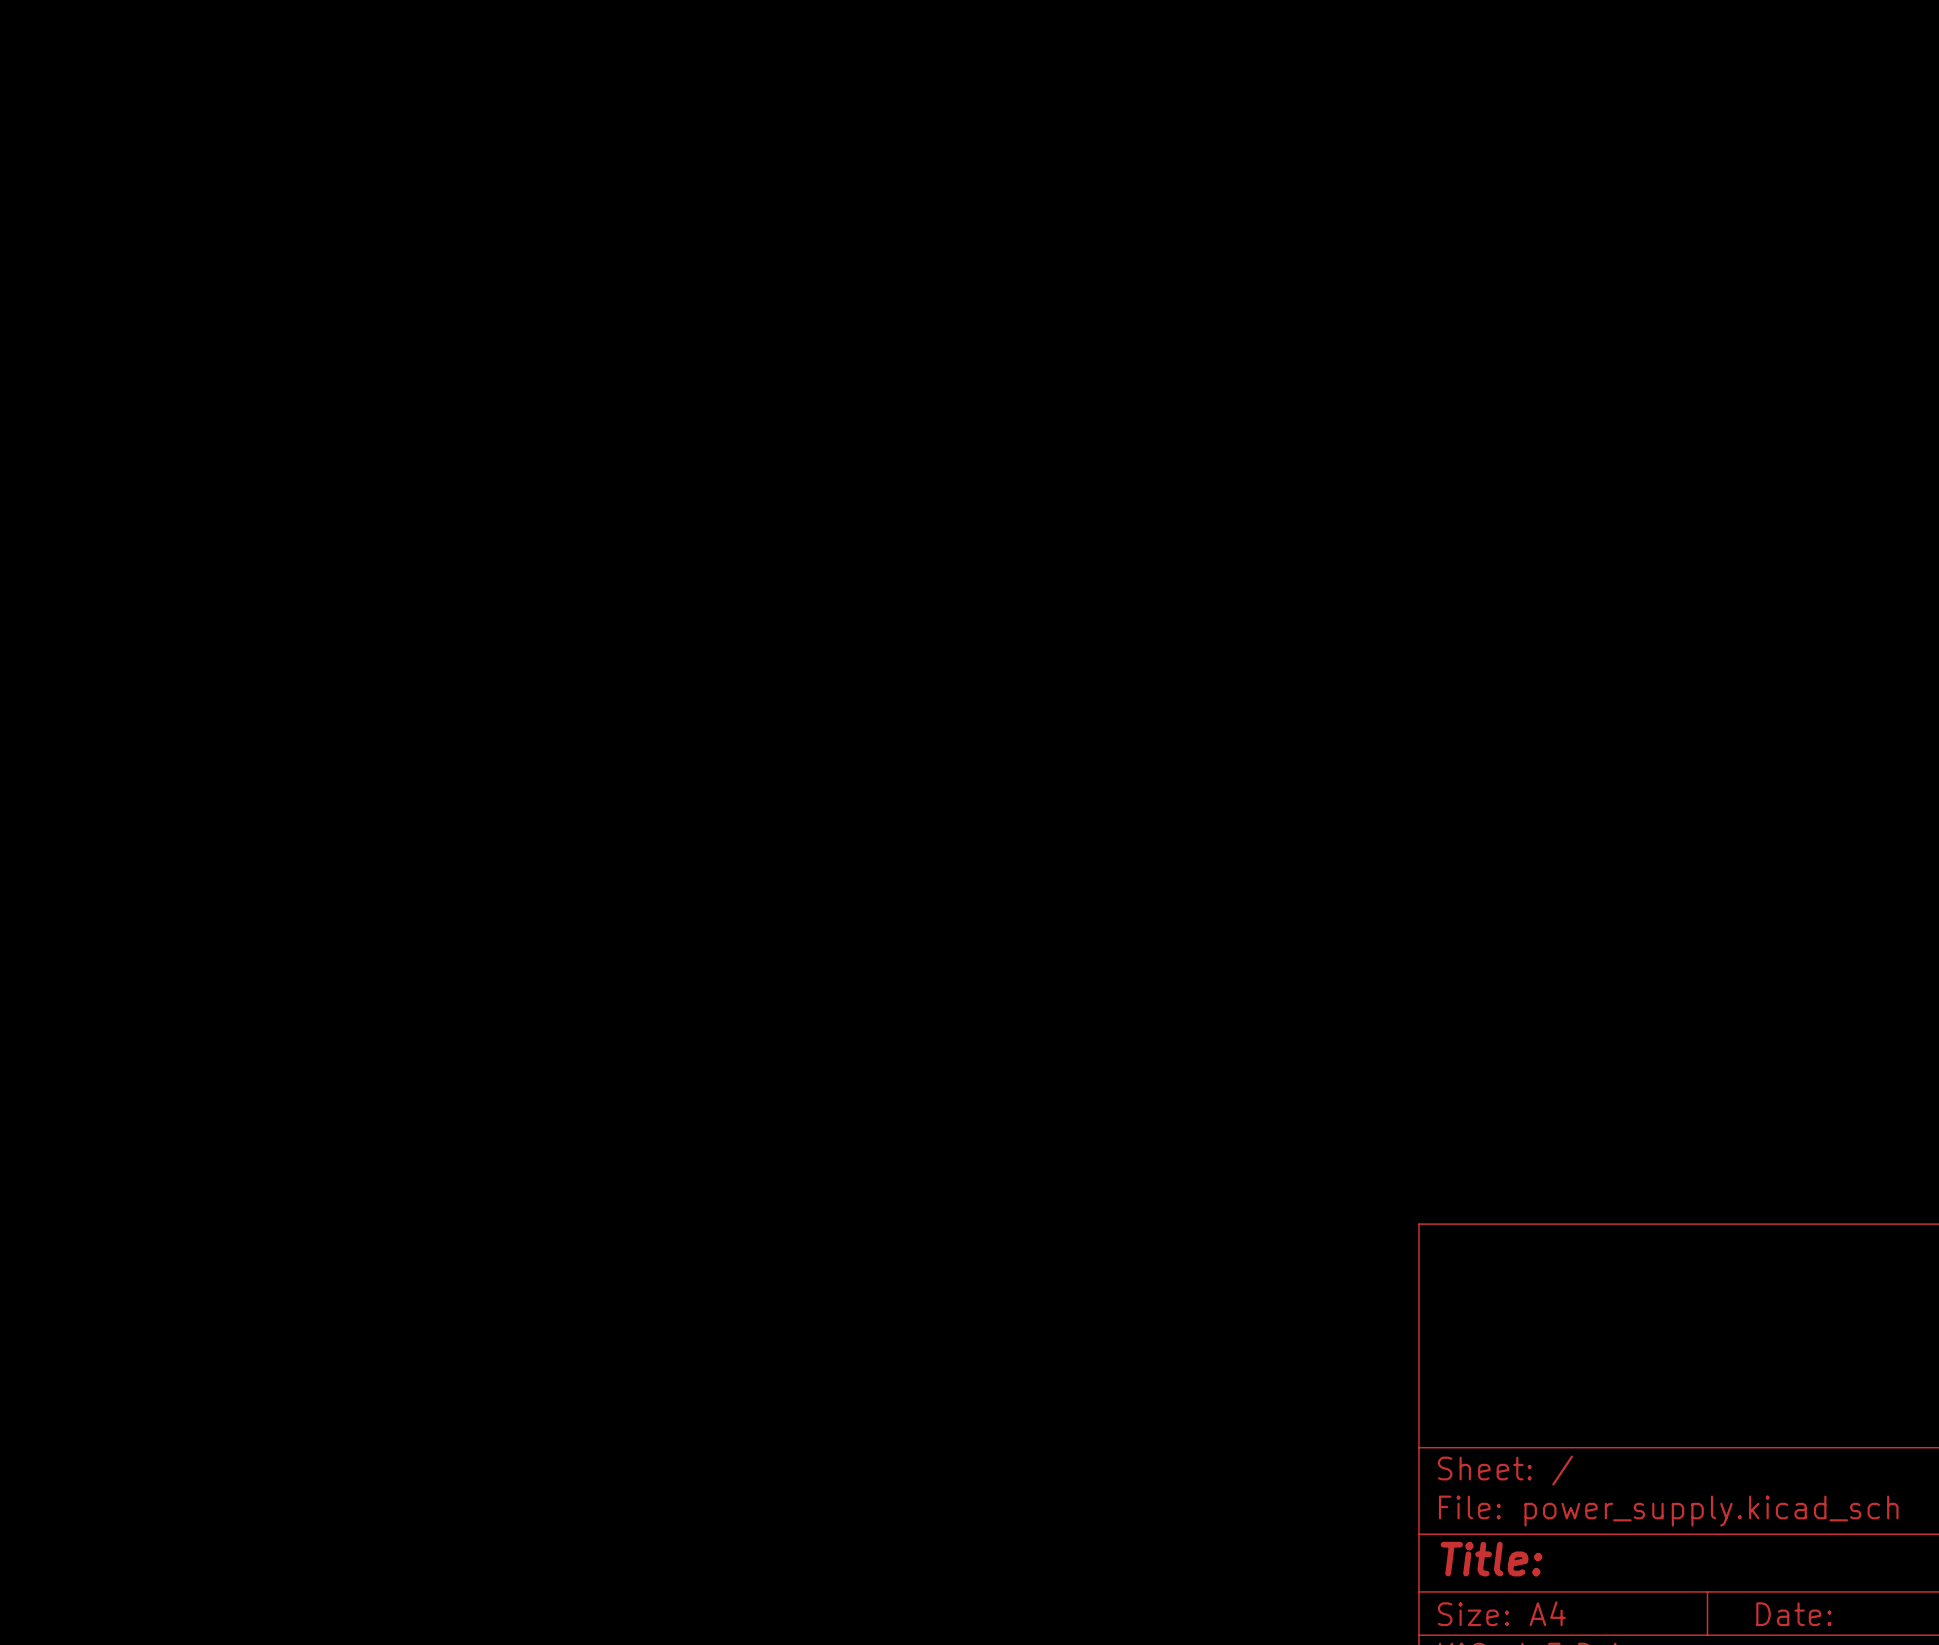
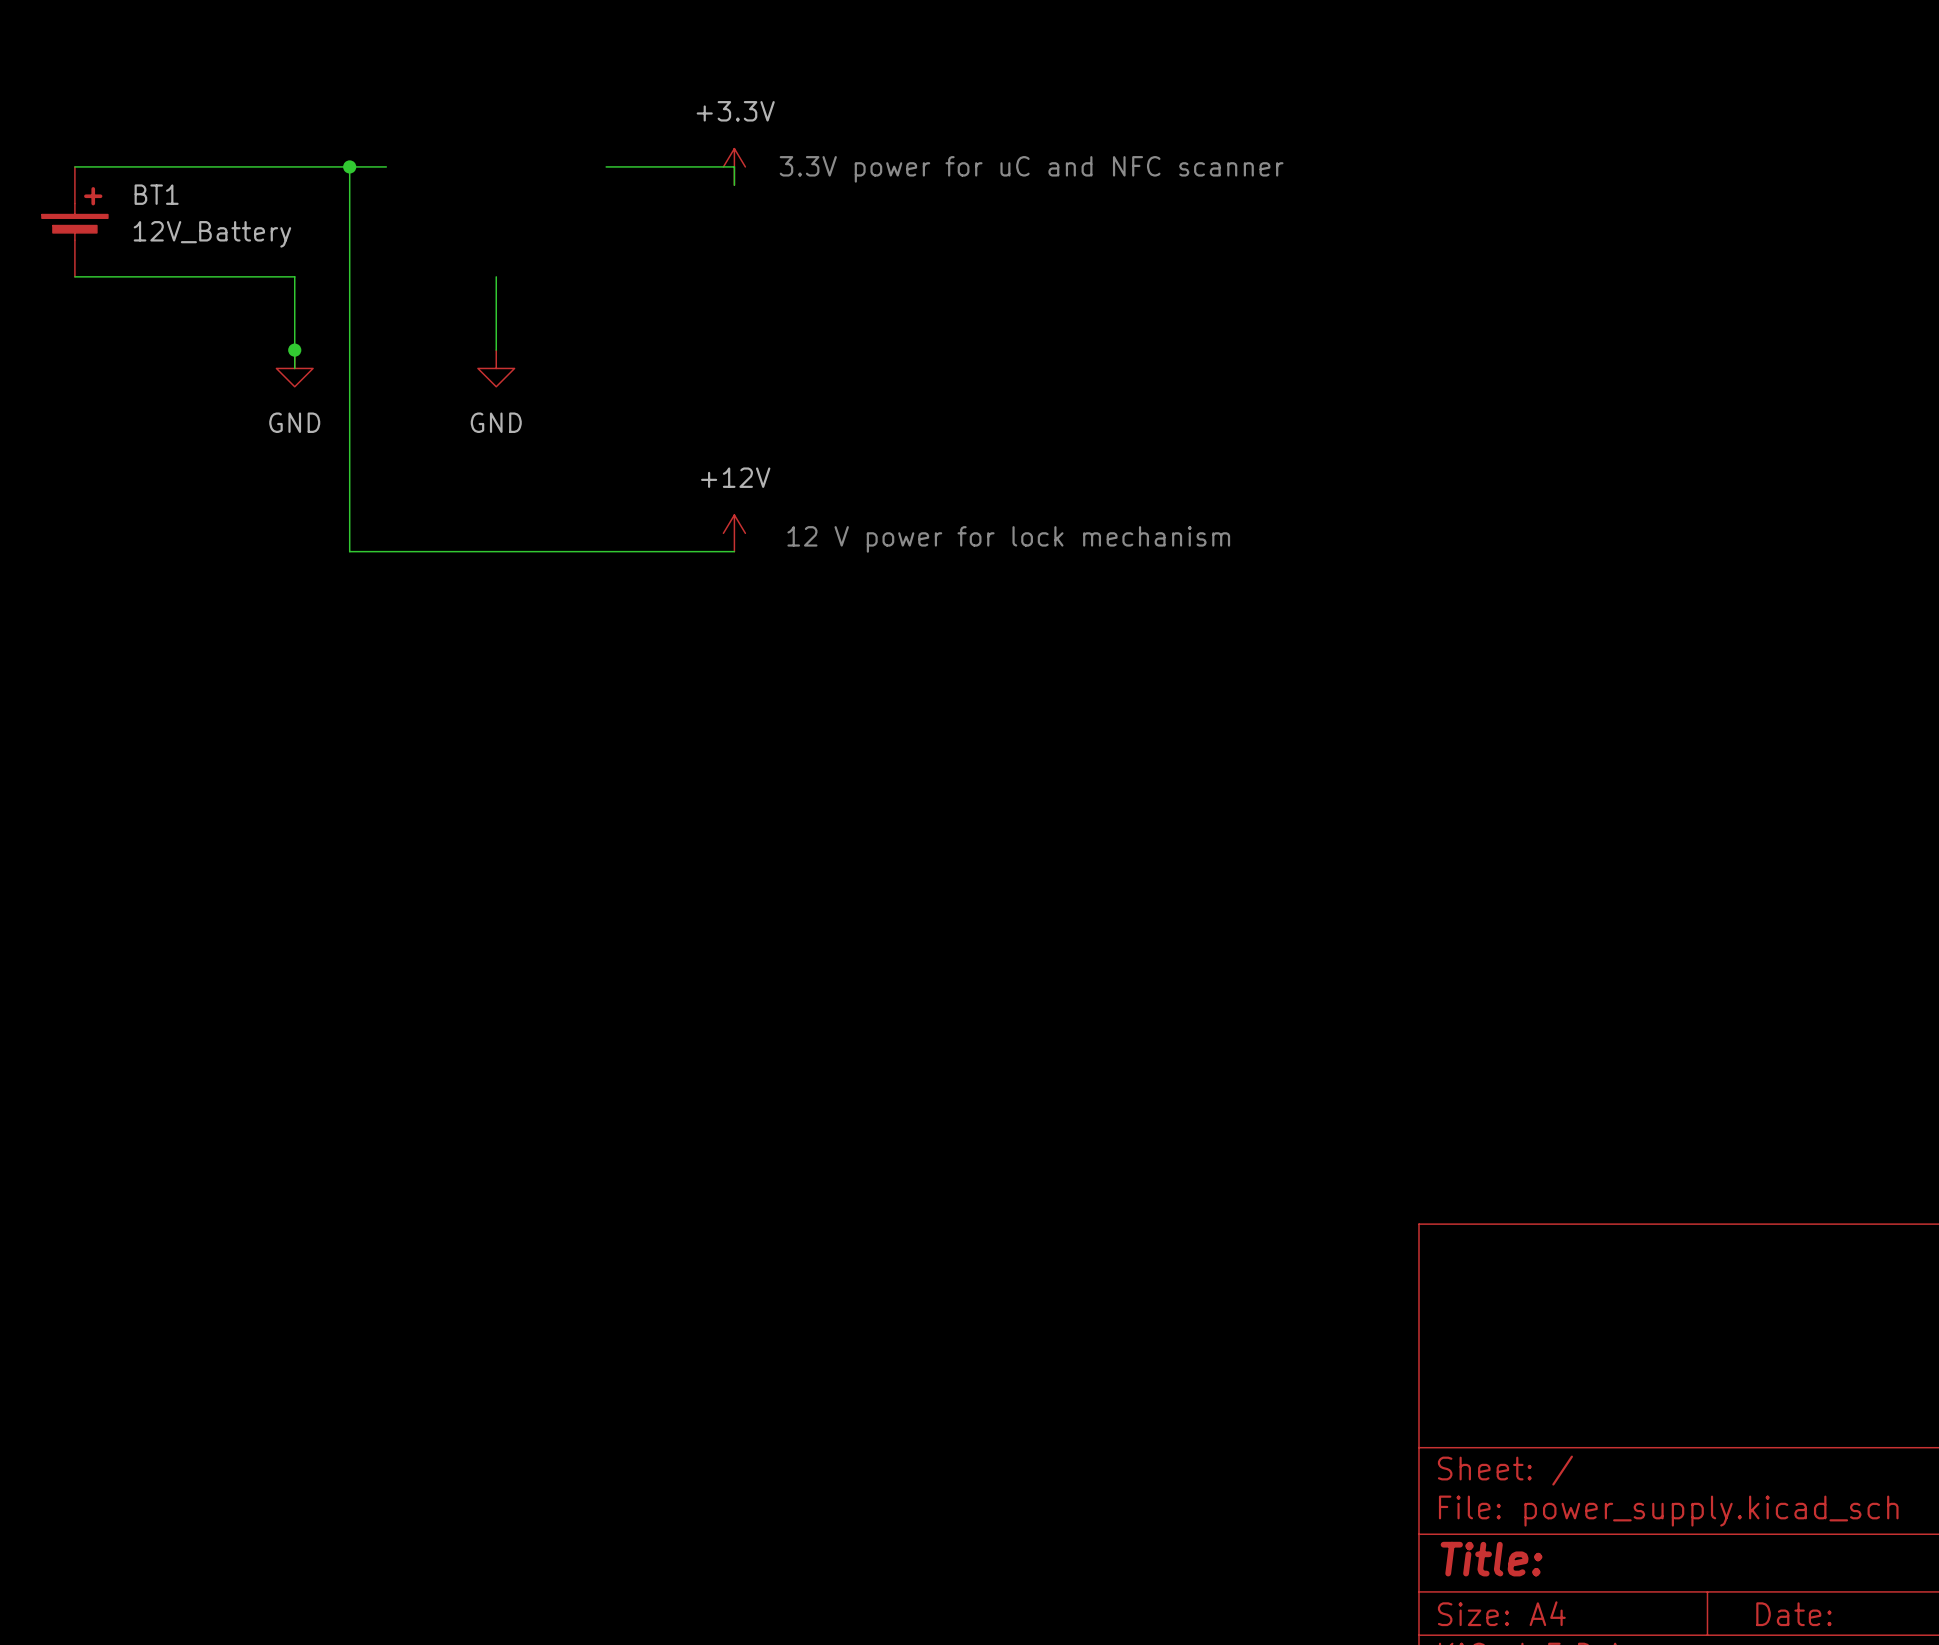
wire: none -> (74, 166) (386, 166)
wire: none -> (349, 166) (349, 551) (734, 551)
junction: none -> (349, 166)
wire: none -> (606, 166) (734, 166) (734, 185)
power symbol: none -> +3.3V (734, 166)
text: none -> 3.3V power for uC and NFC scanner (1031, 169)
BT1: none -> 12V_Battery (74, 221)
wire: none -> (74, 276) (294, 276) (294, 368)
wire: none -> (496, 276) (496, 350)
junction: none -> (294, 350)
power symbol: none -> GND (294, 368)
power symbol: none -> GND (496, 368)
power symbol: none -> +12V (734, 533)
text: none -> 12 V power for lock mechanism (1008, 539)

